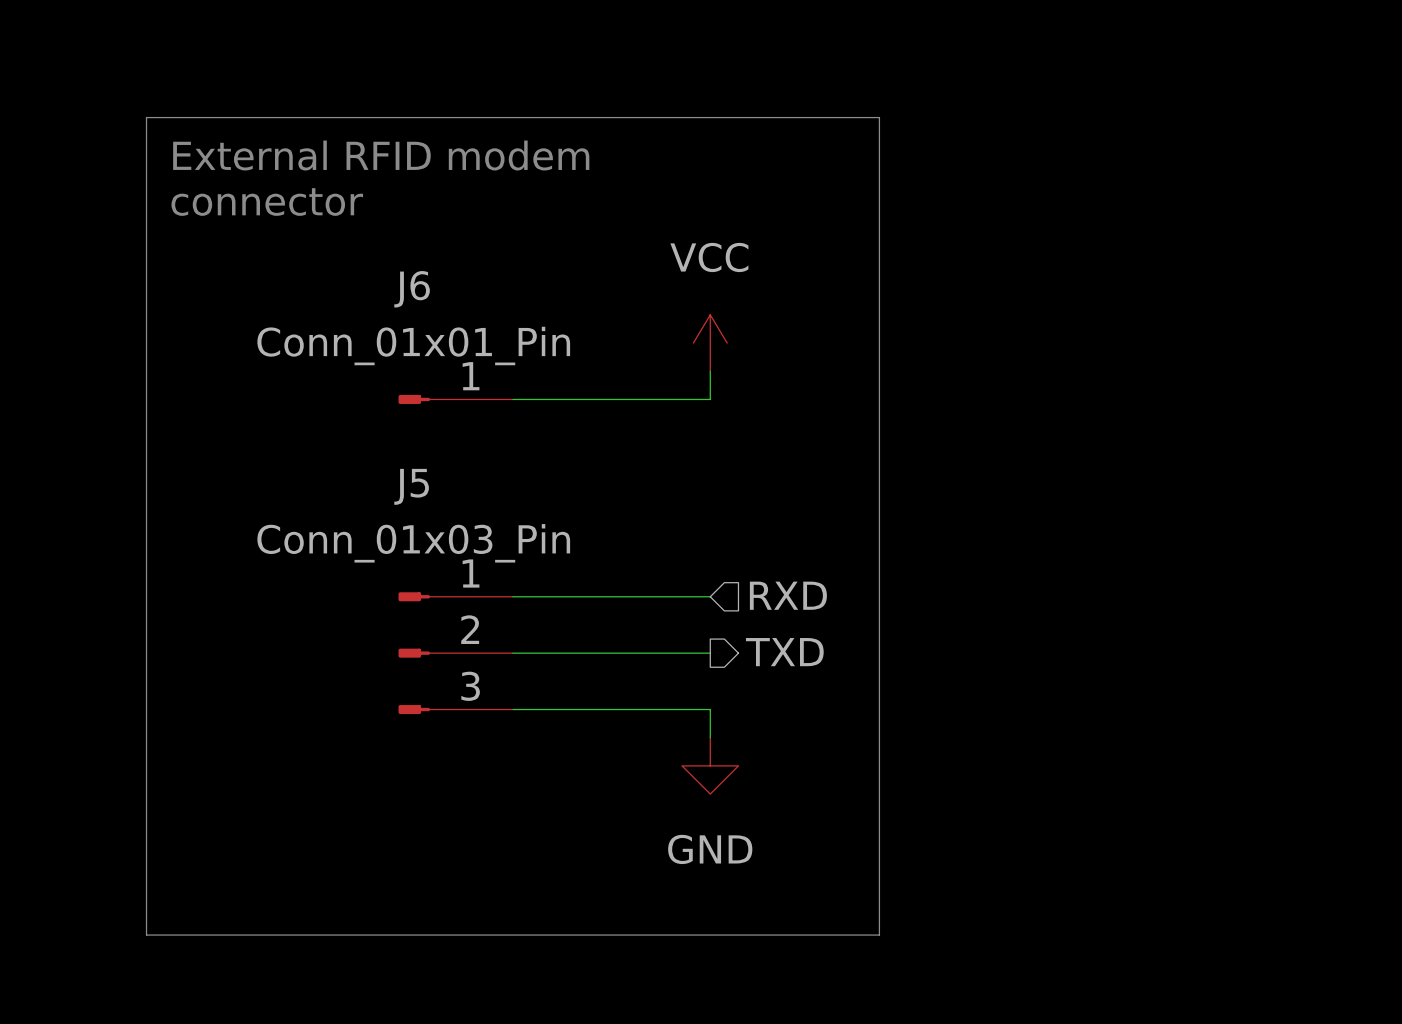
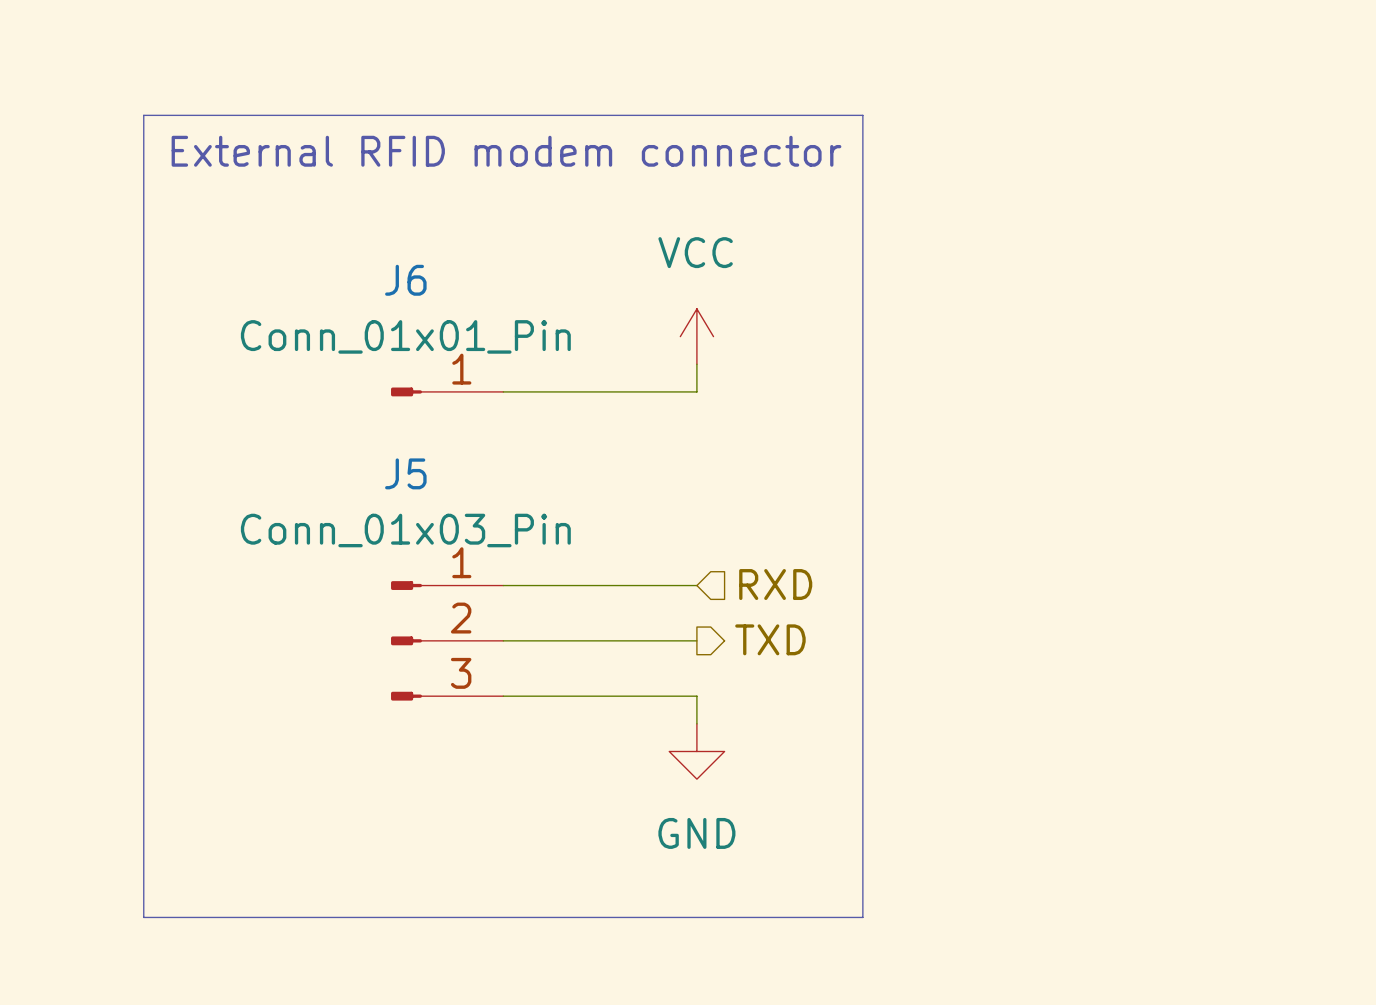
text: External RFID modem (381, 155) -> External RFID modem connector (506, 151)
text: connector (267, 202) -> none

